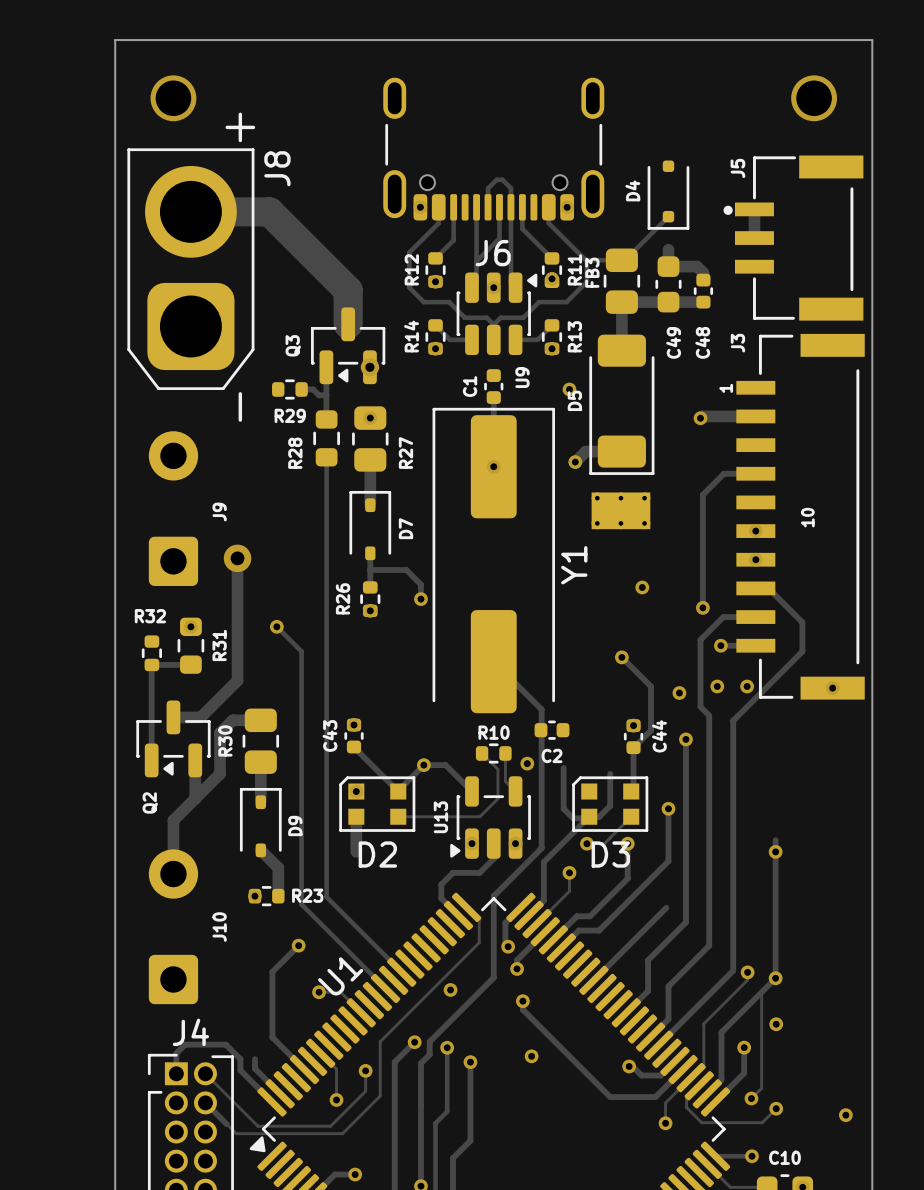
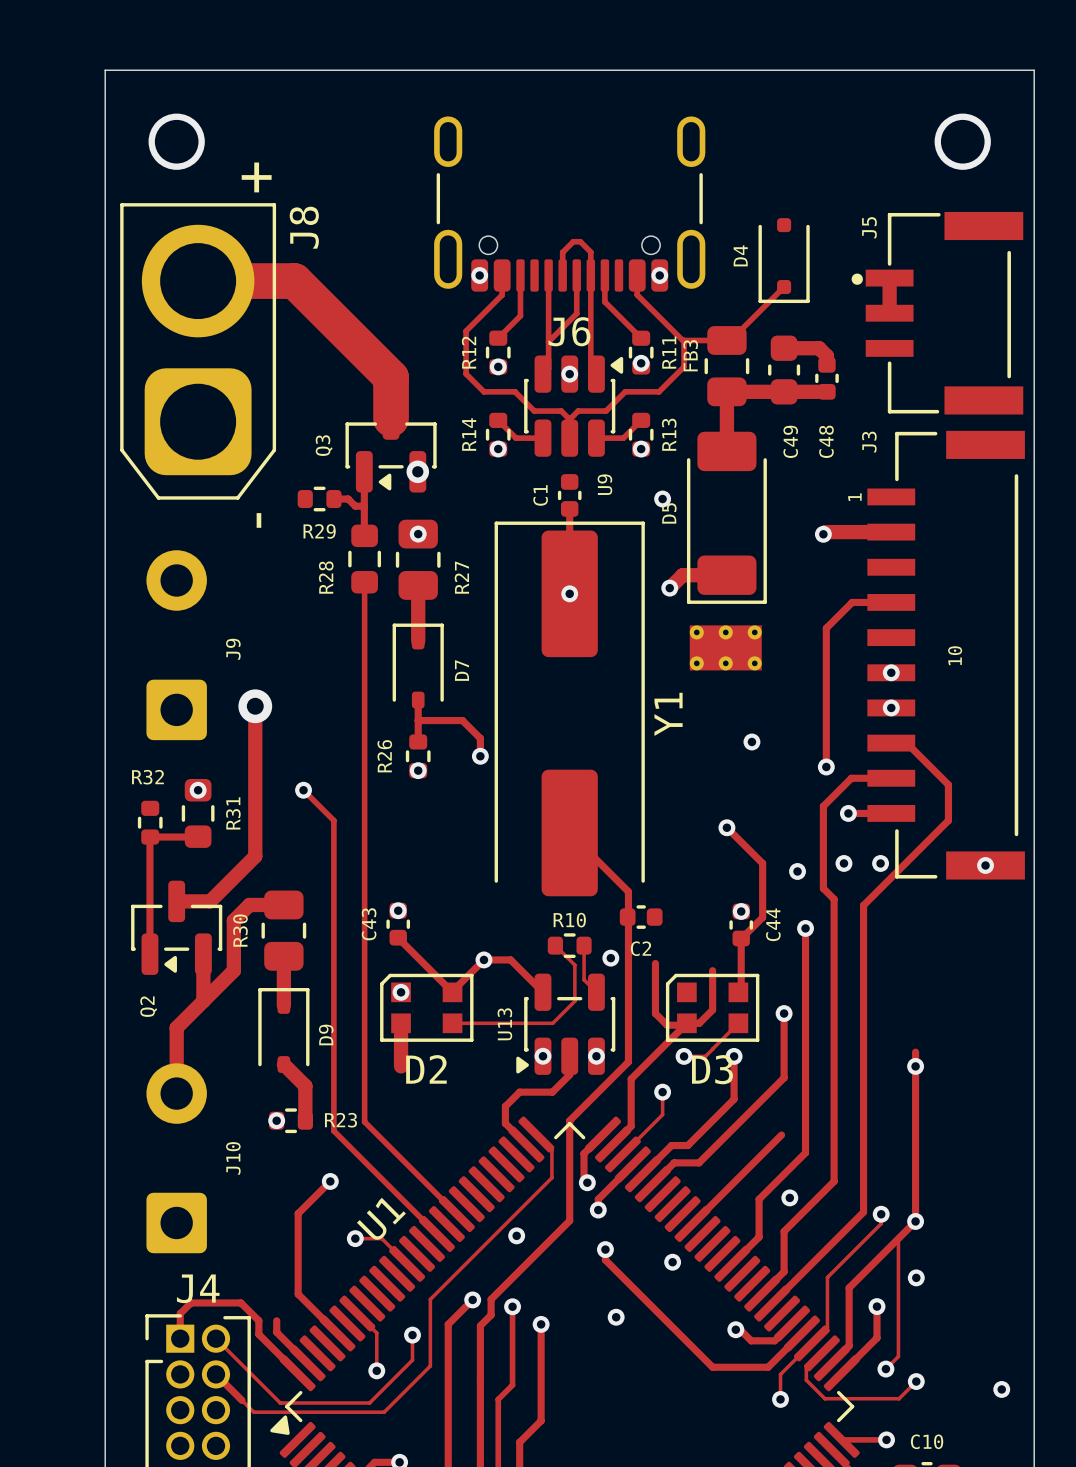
track: (668, 249) (668, 266) -> none
via: none -> (789, 1197)
via: none -> (672, 1262)

